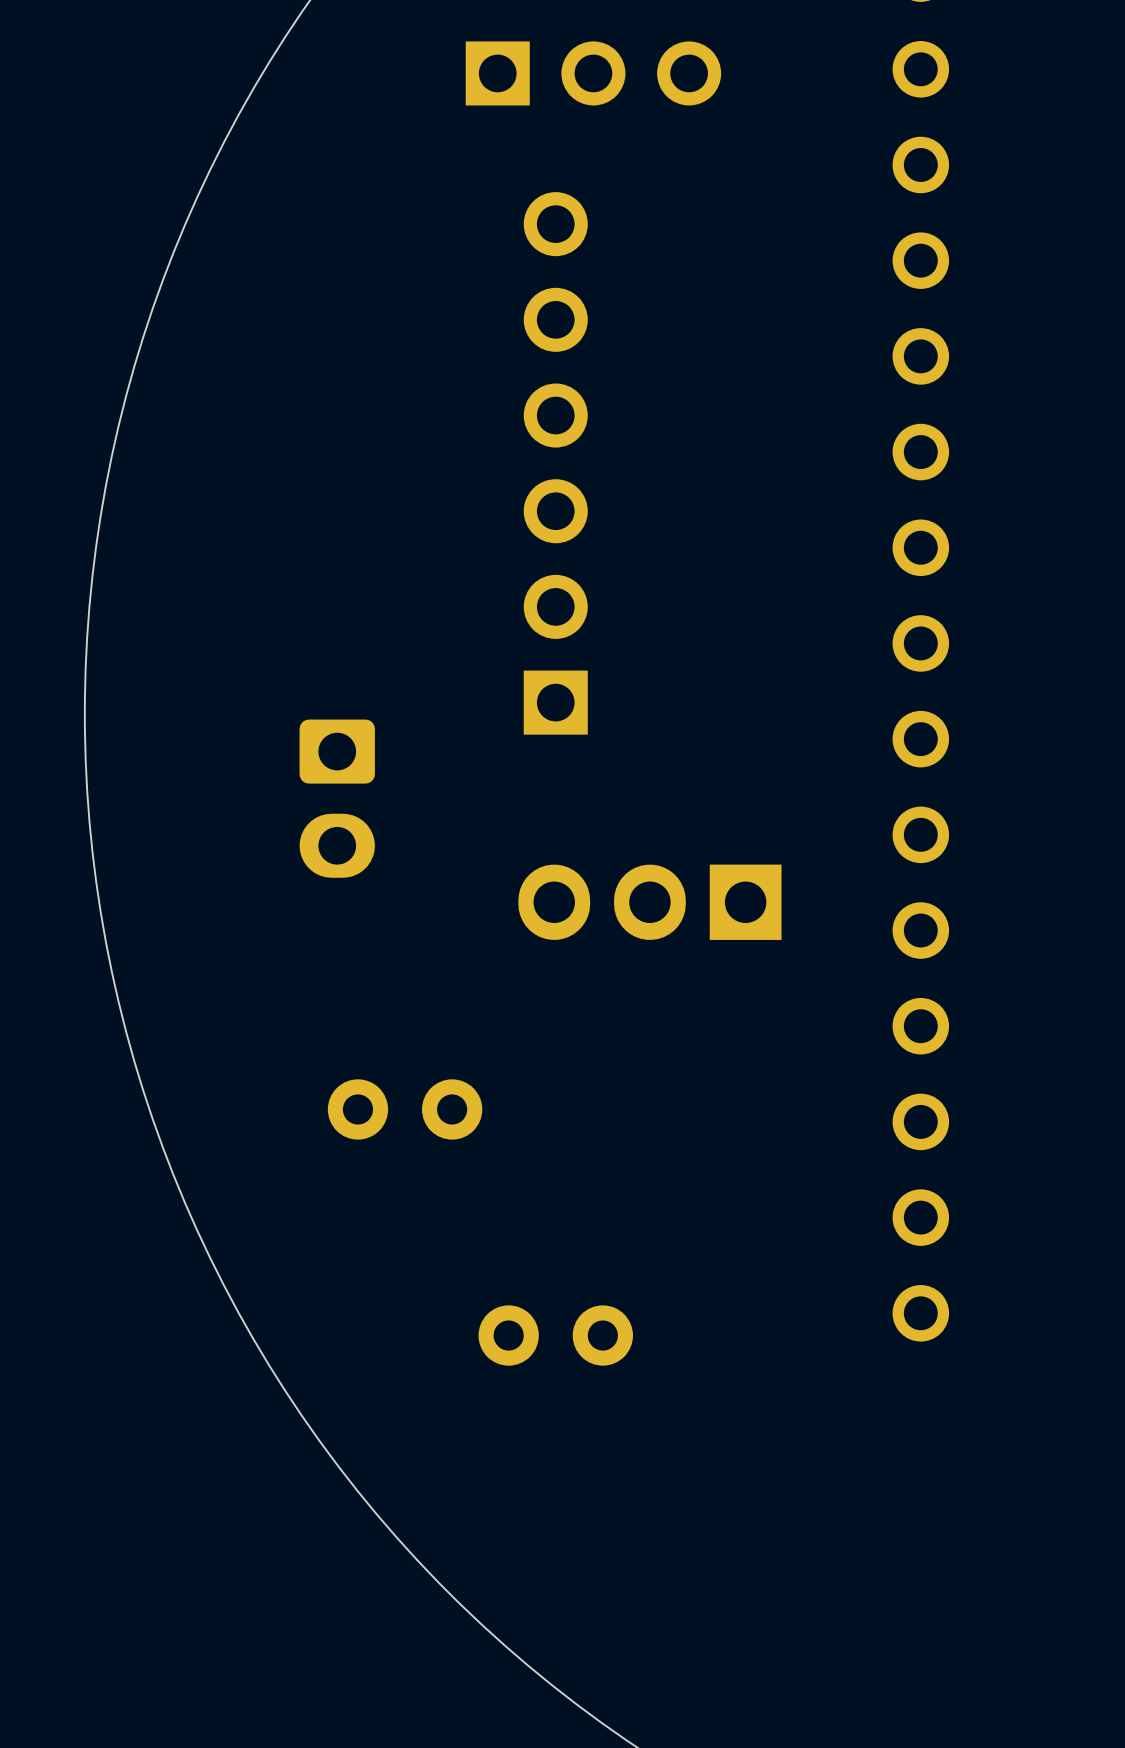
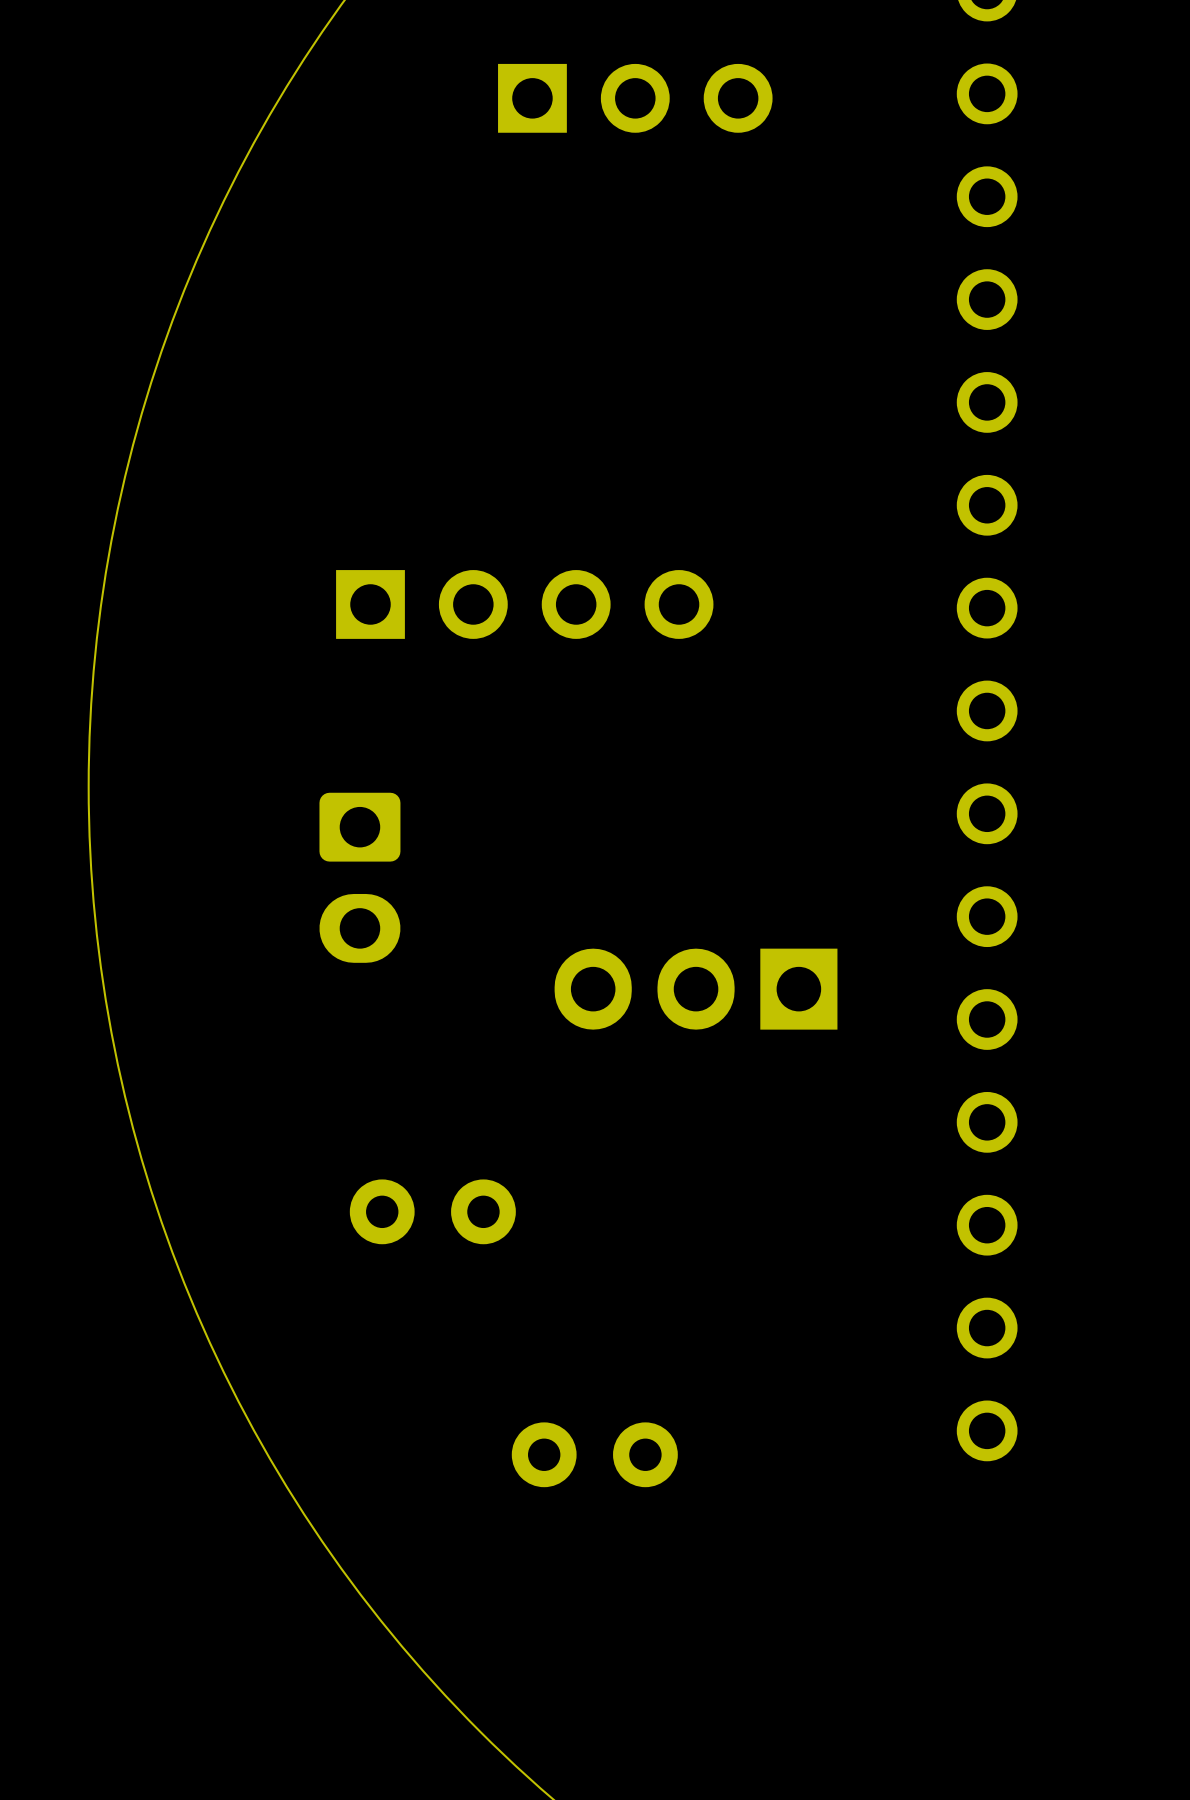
part: (555, 463) -> none
part: none -> (524, 604)

